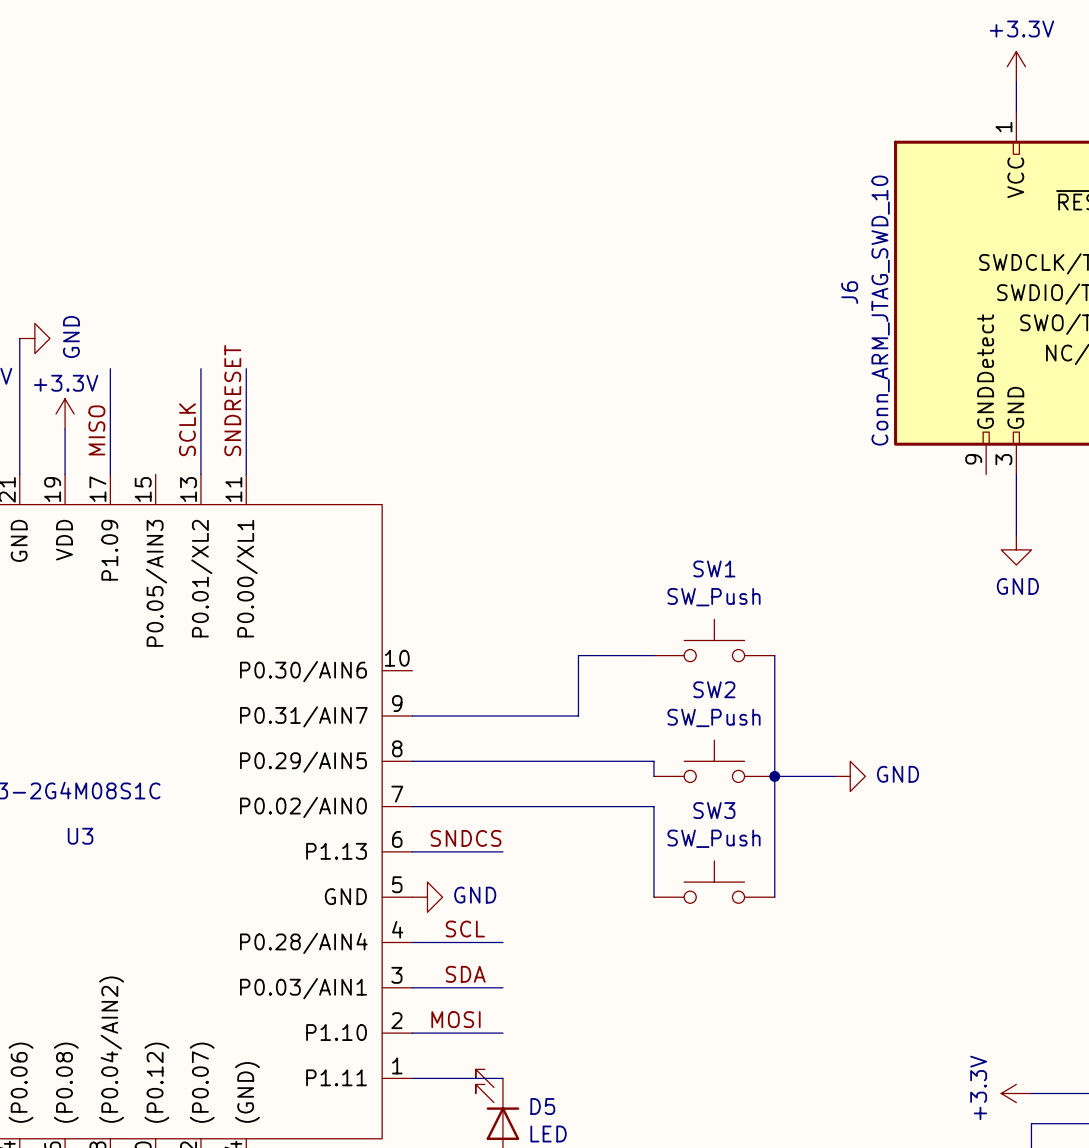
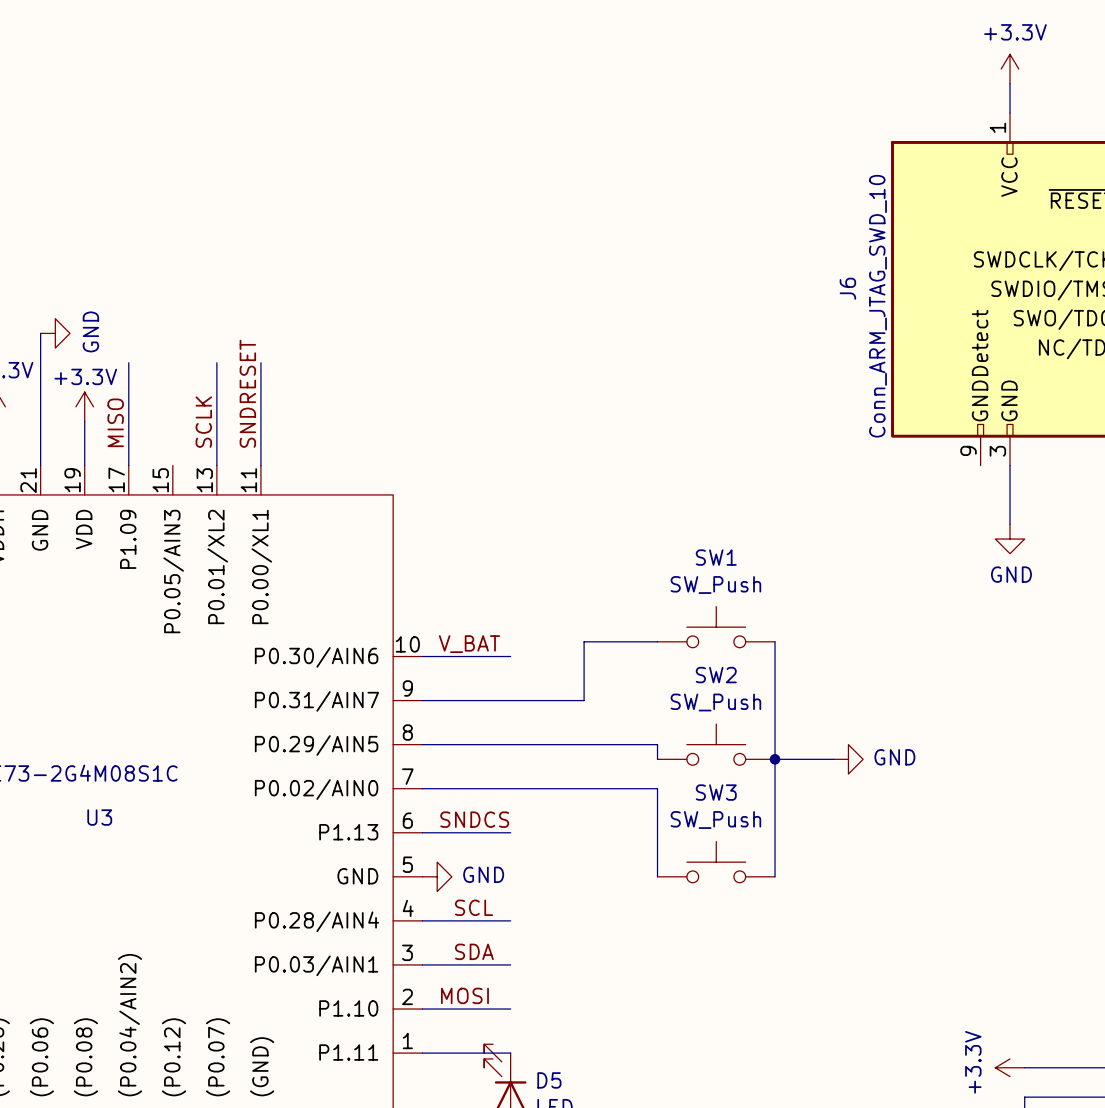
label: none -> V_BAT (469, 644)
wire: none -> (422, 656) (510, 656)

